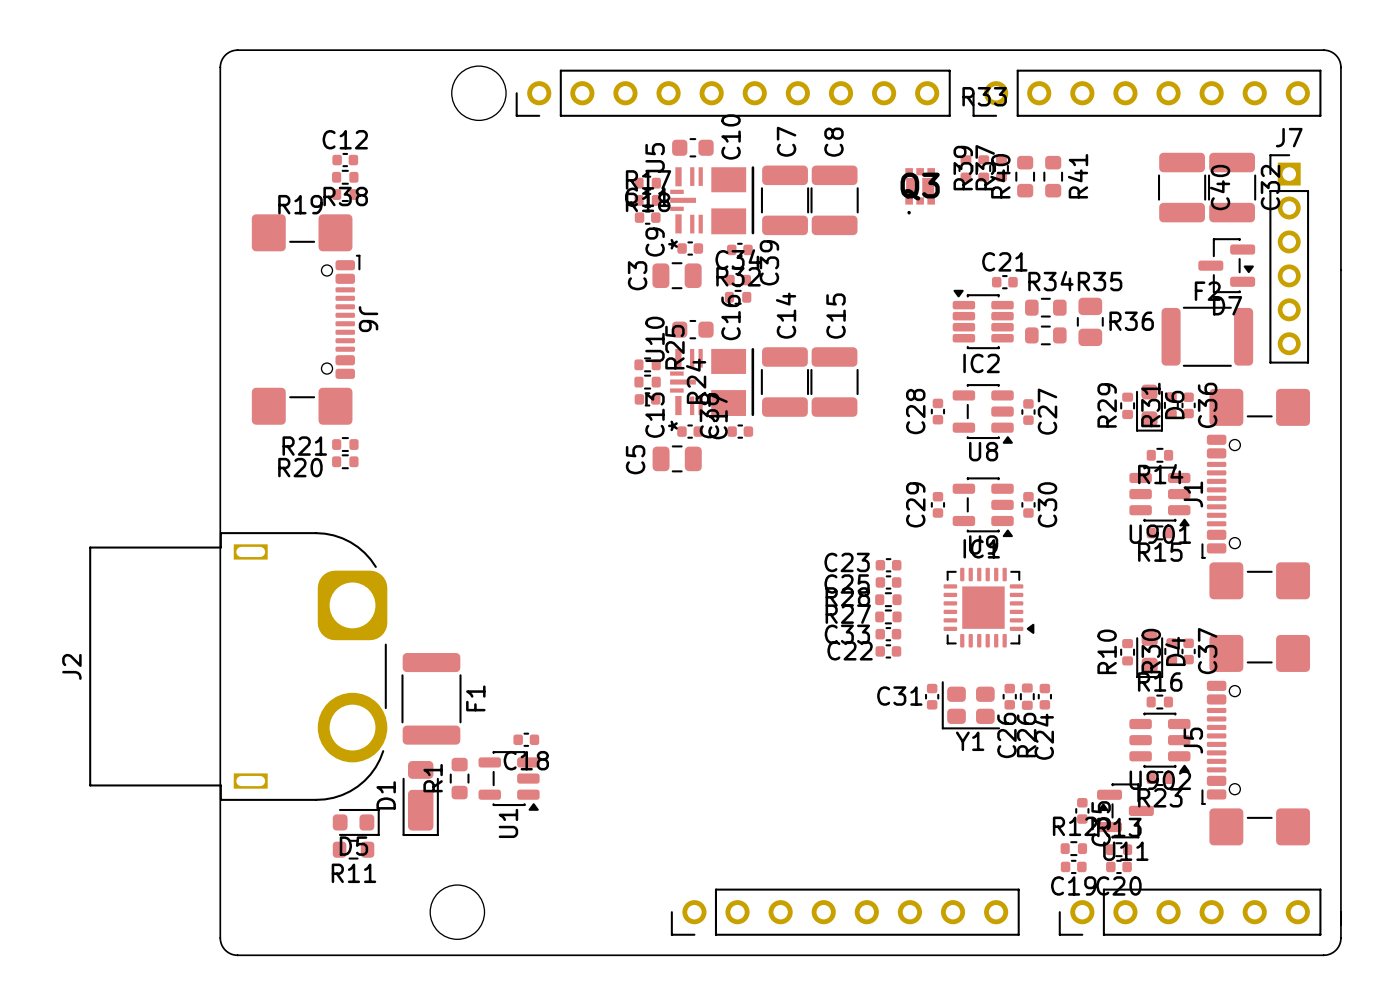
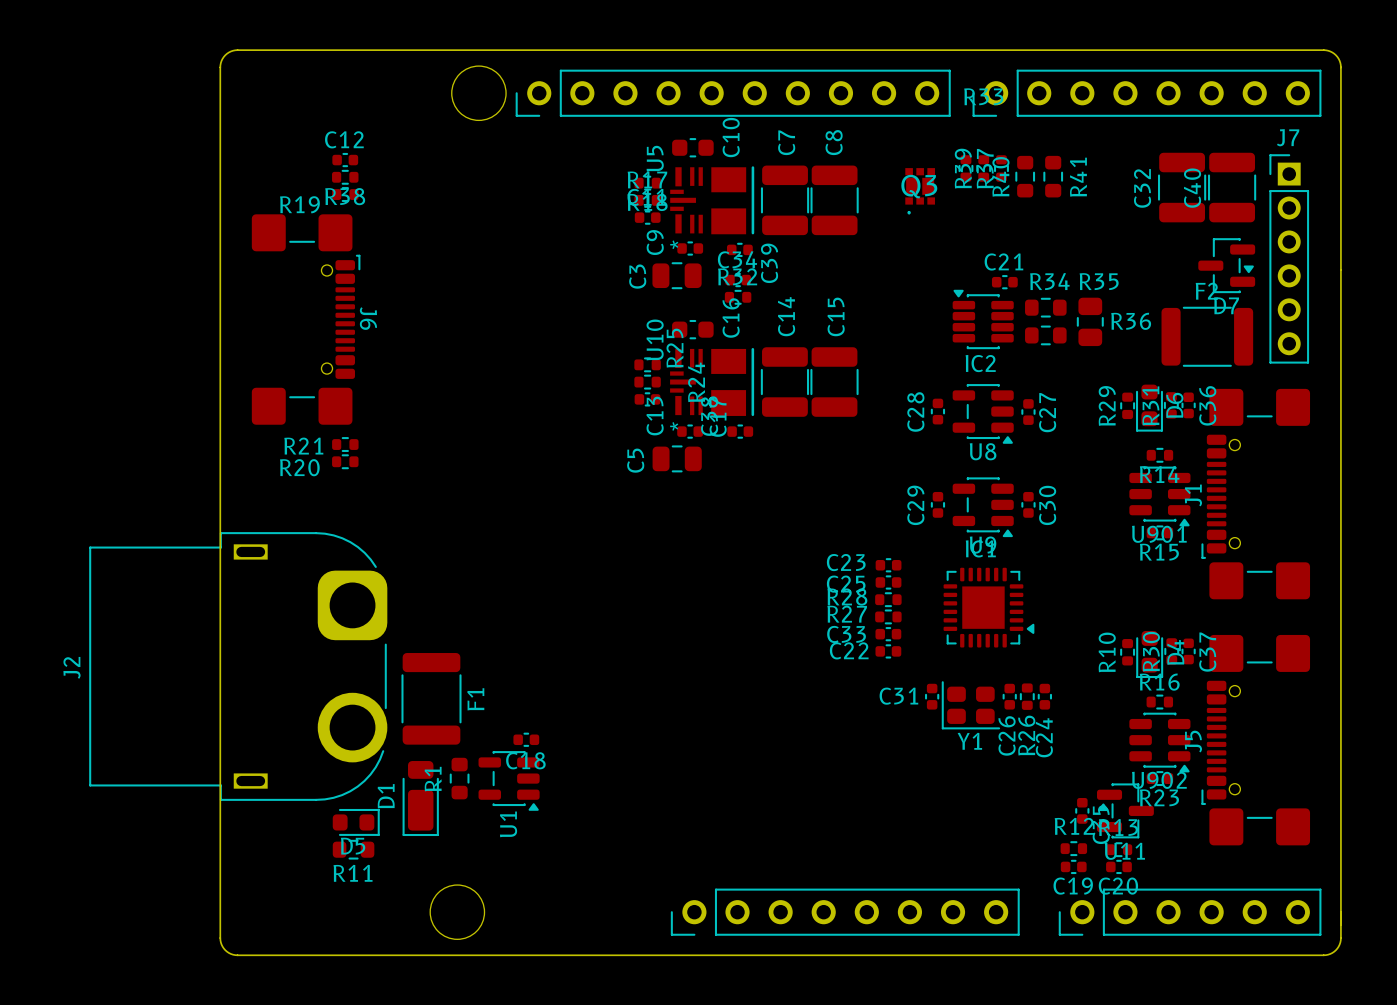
C40 name: C40 (1220, 187) -> C32 (1142, 188)
C32 name: C32 (1270, 187) -> C40 (1192, 188)

